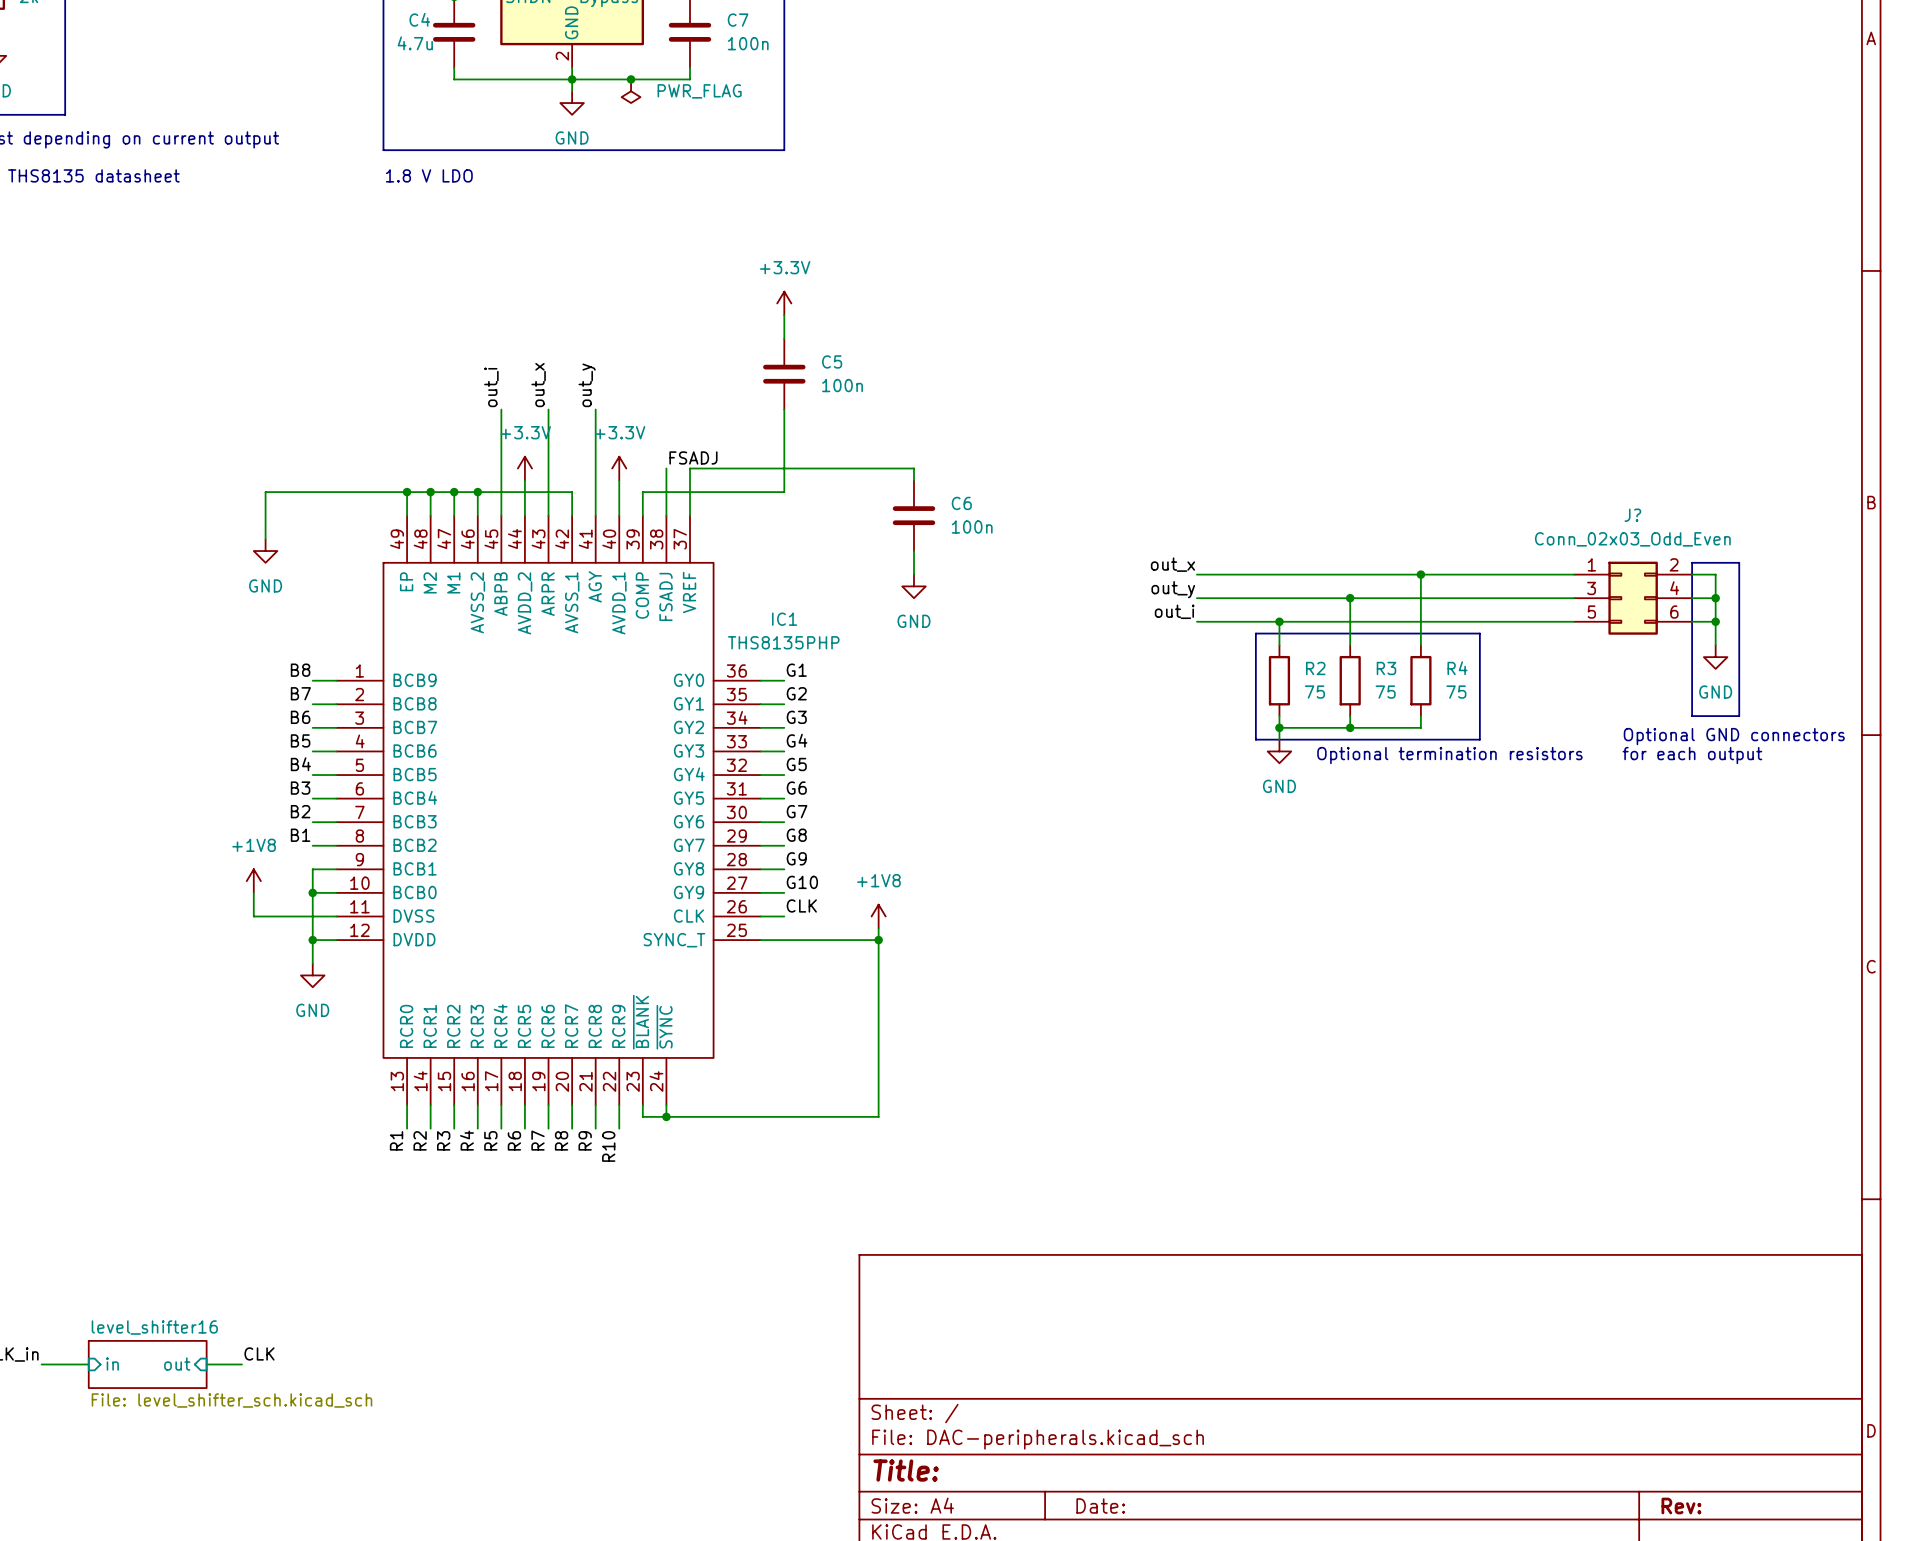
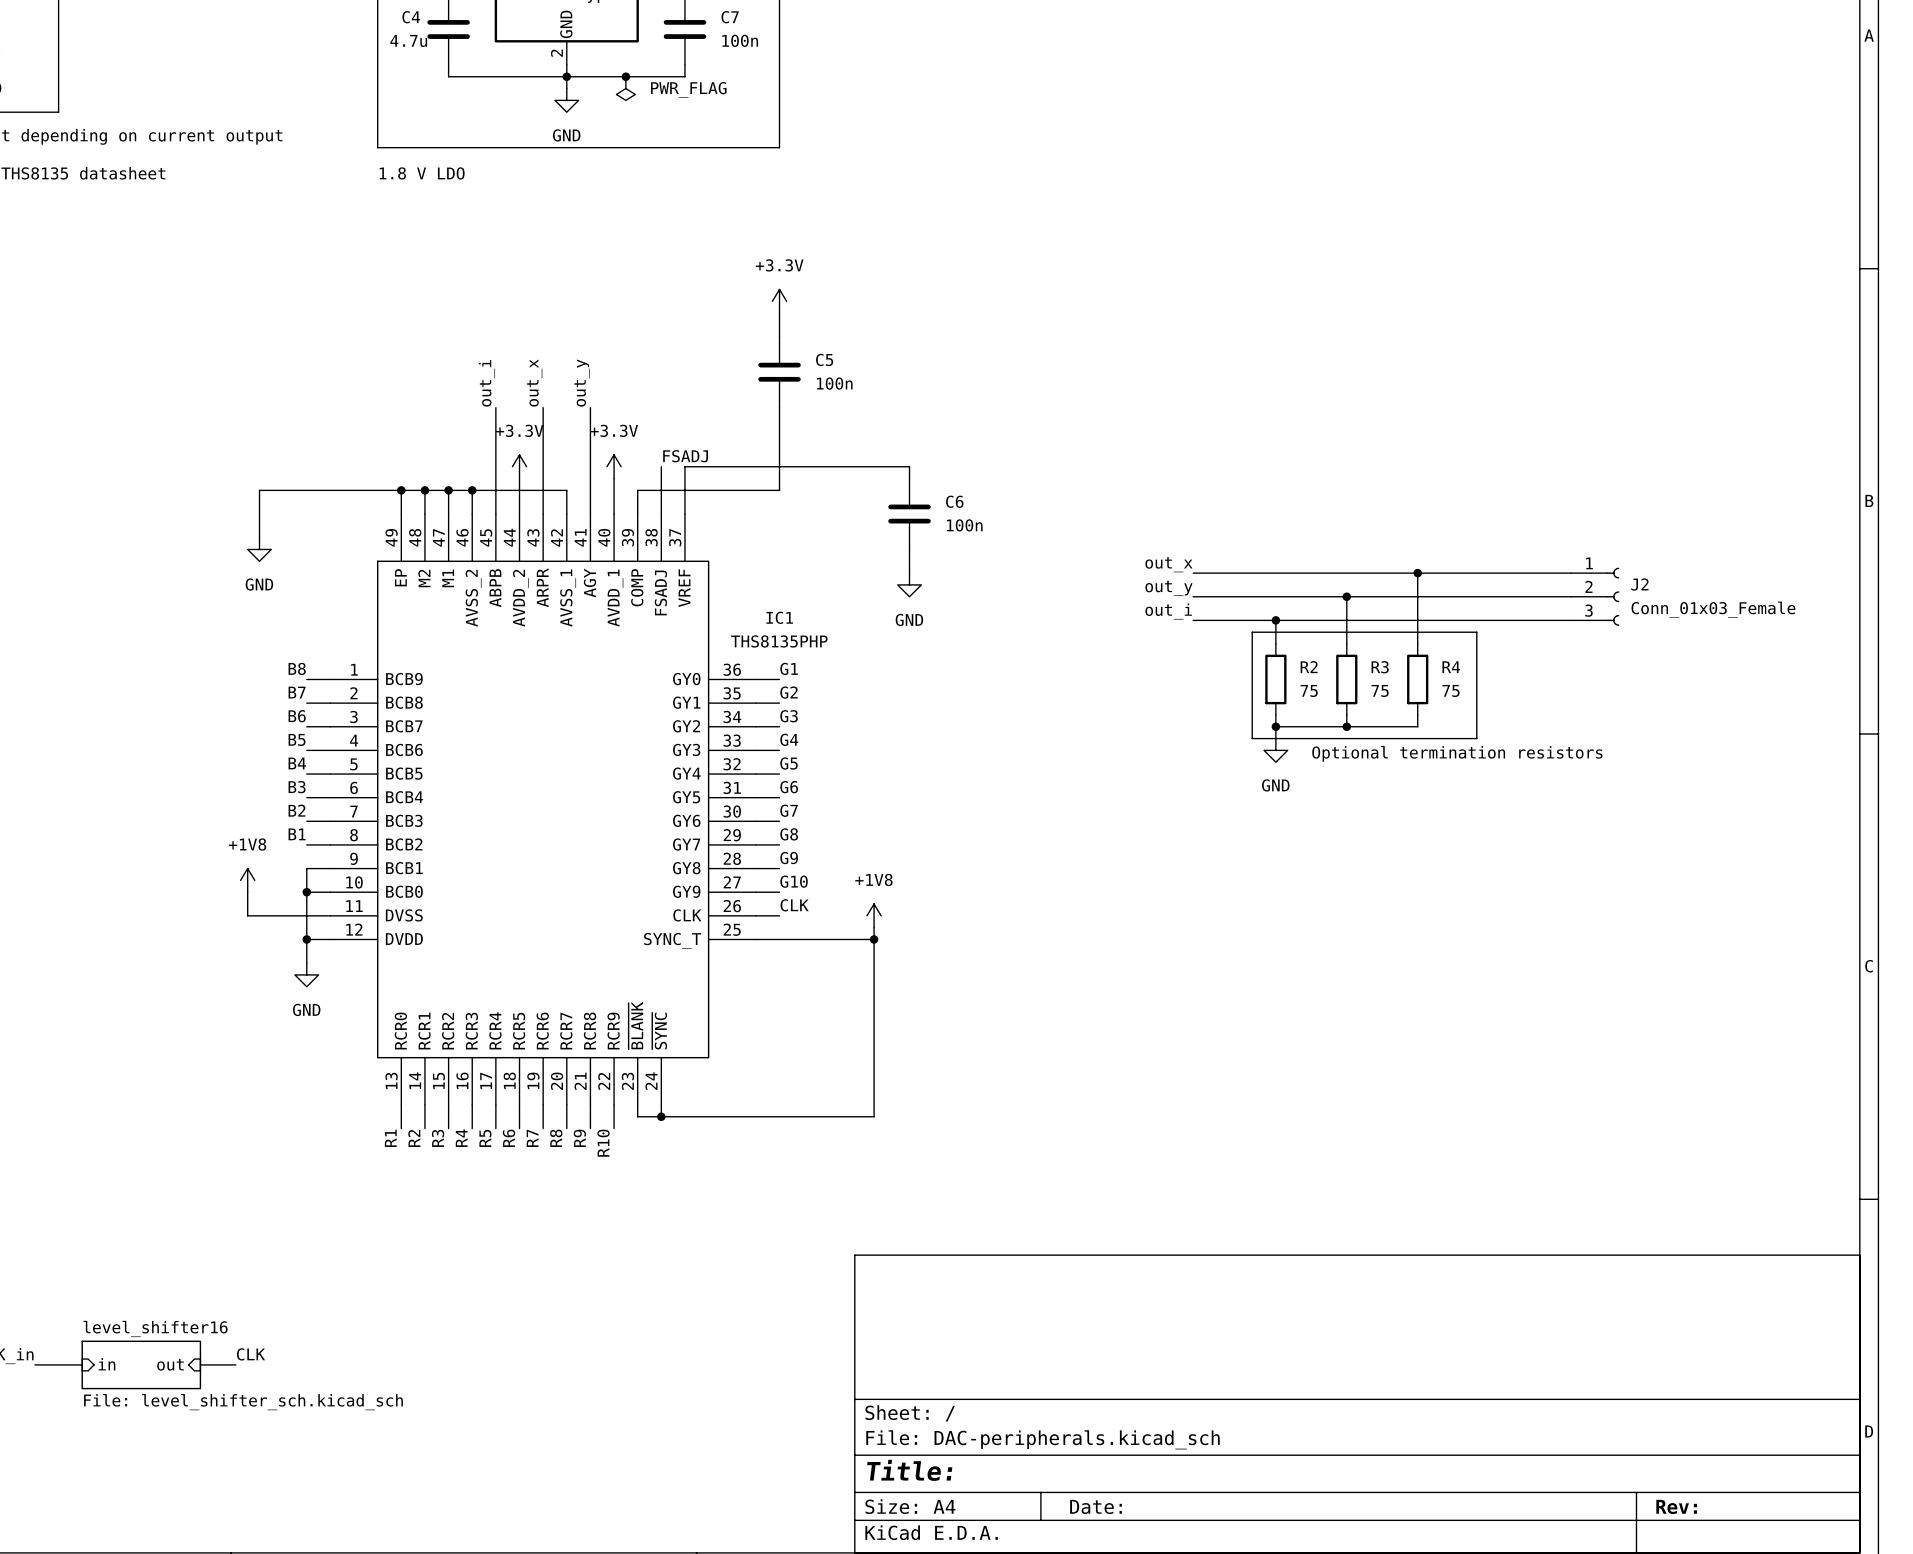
line: (1692, 562) (1739, 562) (1739, 716) (1692, 716) (1692, 562) -> none
wire: (1692, 574) (1715, 574) (1715, 645) -> none
J2: none -> Conn_01x03_Female (1595, 596)
J?: Conn_02x03_Odd_Even (1633, 598) -> none
wire: (1692, 598) (1715, 598) -> none
junction: (1715, 598) -> none
wire: (1692, 621) (1715, 621) -> none
junction: (1715, 621) -> none
power symbol: GND (1715, 657) -> none
text: Optional GND connectors (1734, 736) -> none
text: for each output (1692, 755) -> none

